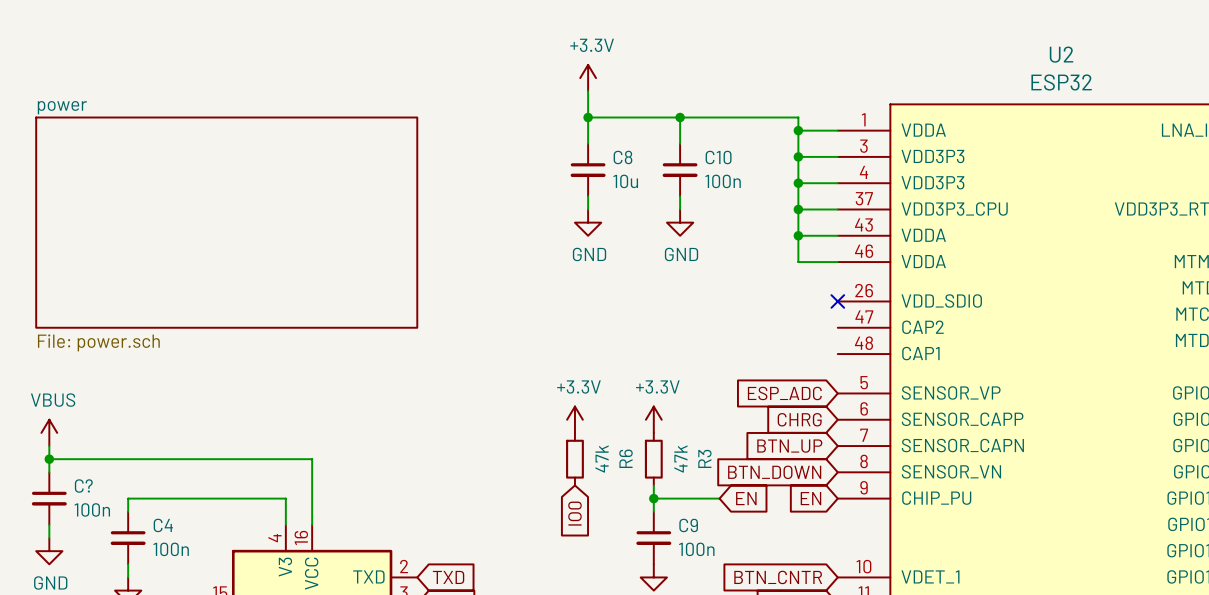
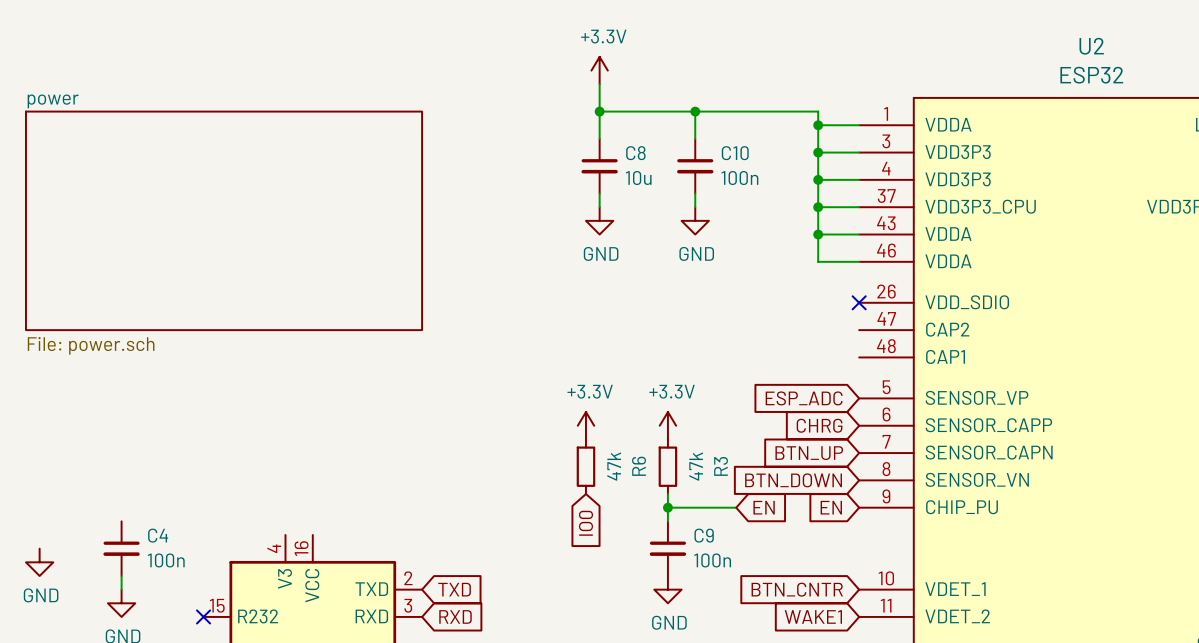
power symbol: VBUS (49, 432) -> none
wire: (49, 446) (49, 472) -> none
wire: (49, 459) (312, 459) (312, 524) -> none
junction: (49, 459) -> none
C?: 100n (49, 498) -> none
wire: (128, 511) (128, 498) (285, 498) (285, 524) -> none
wire: (49, 524) (49, 538) -> none

